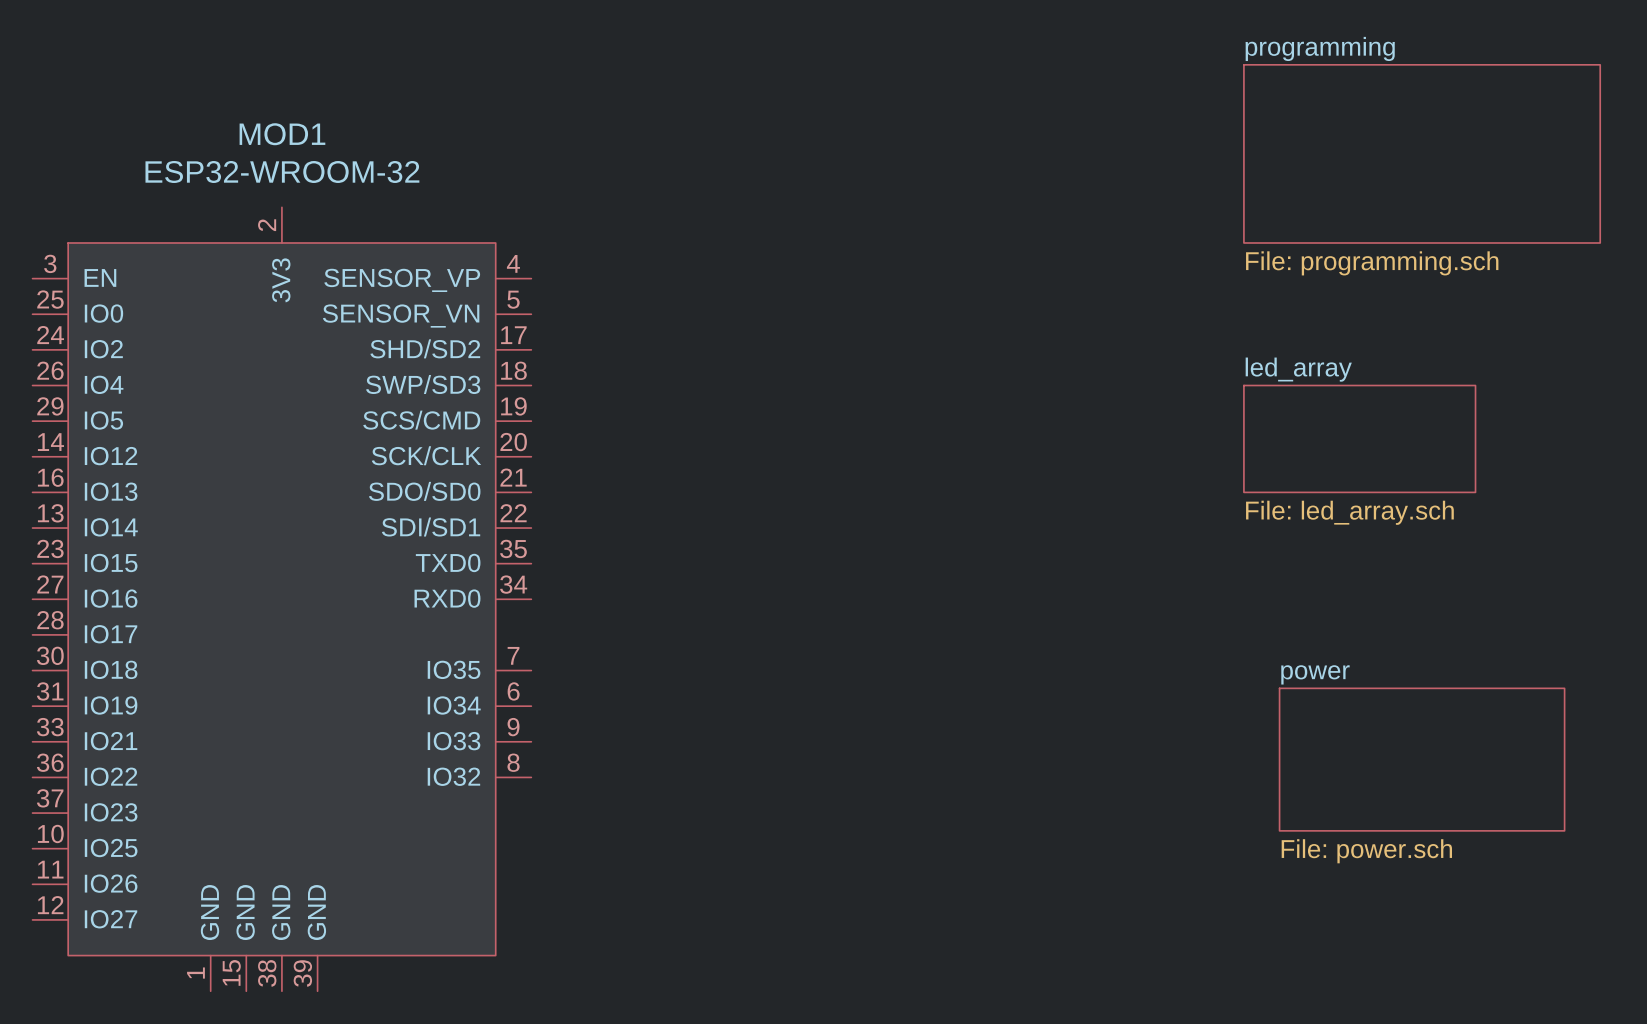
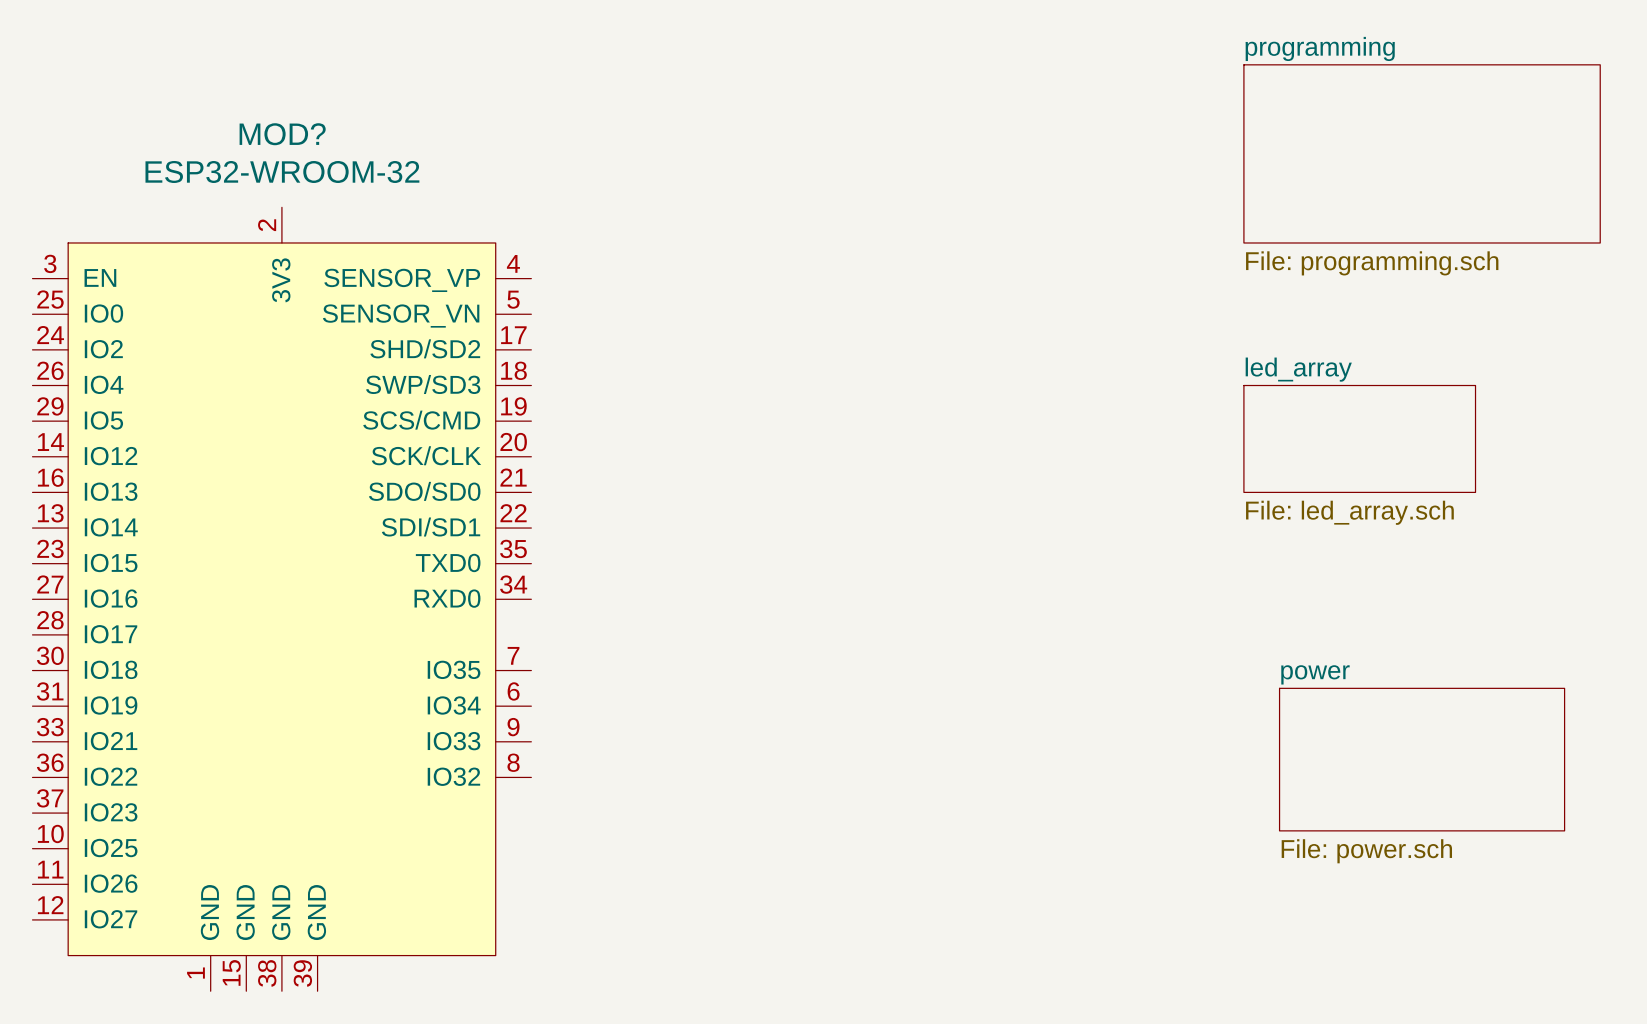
MOD1 name: MOD1 (282, 134) -> MOD? (282, 134)

